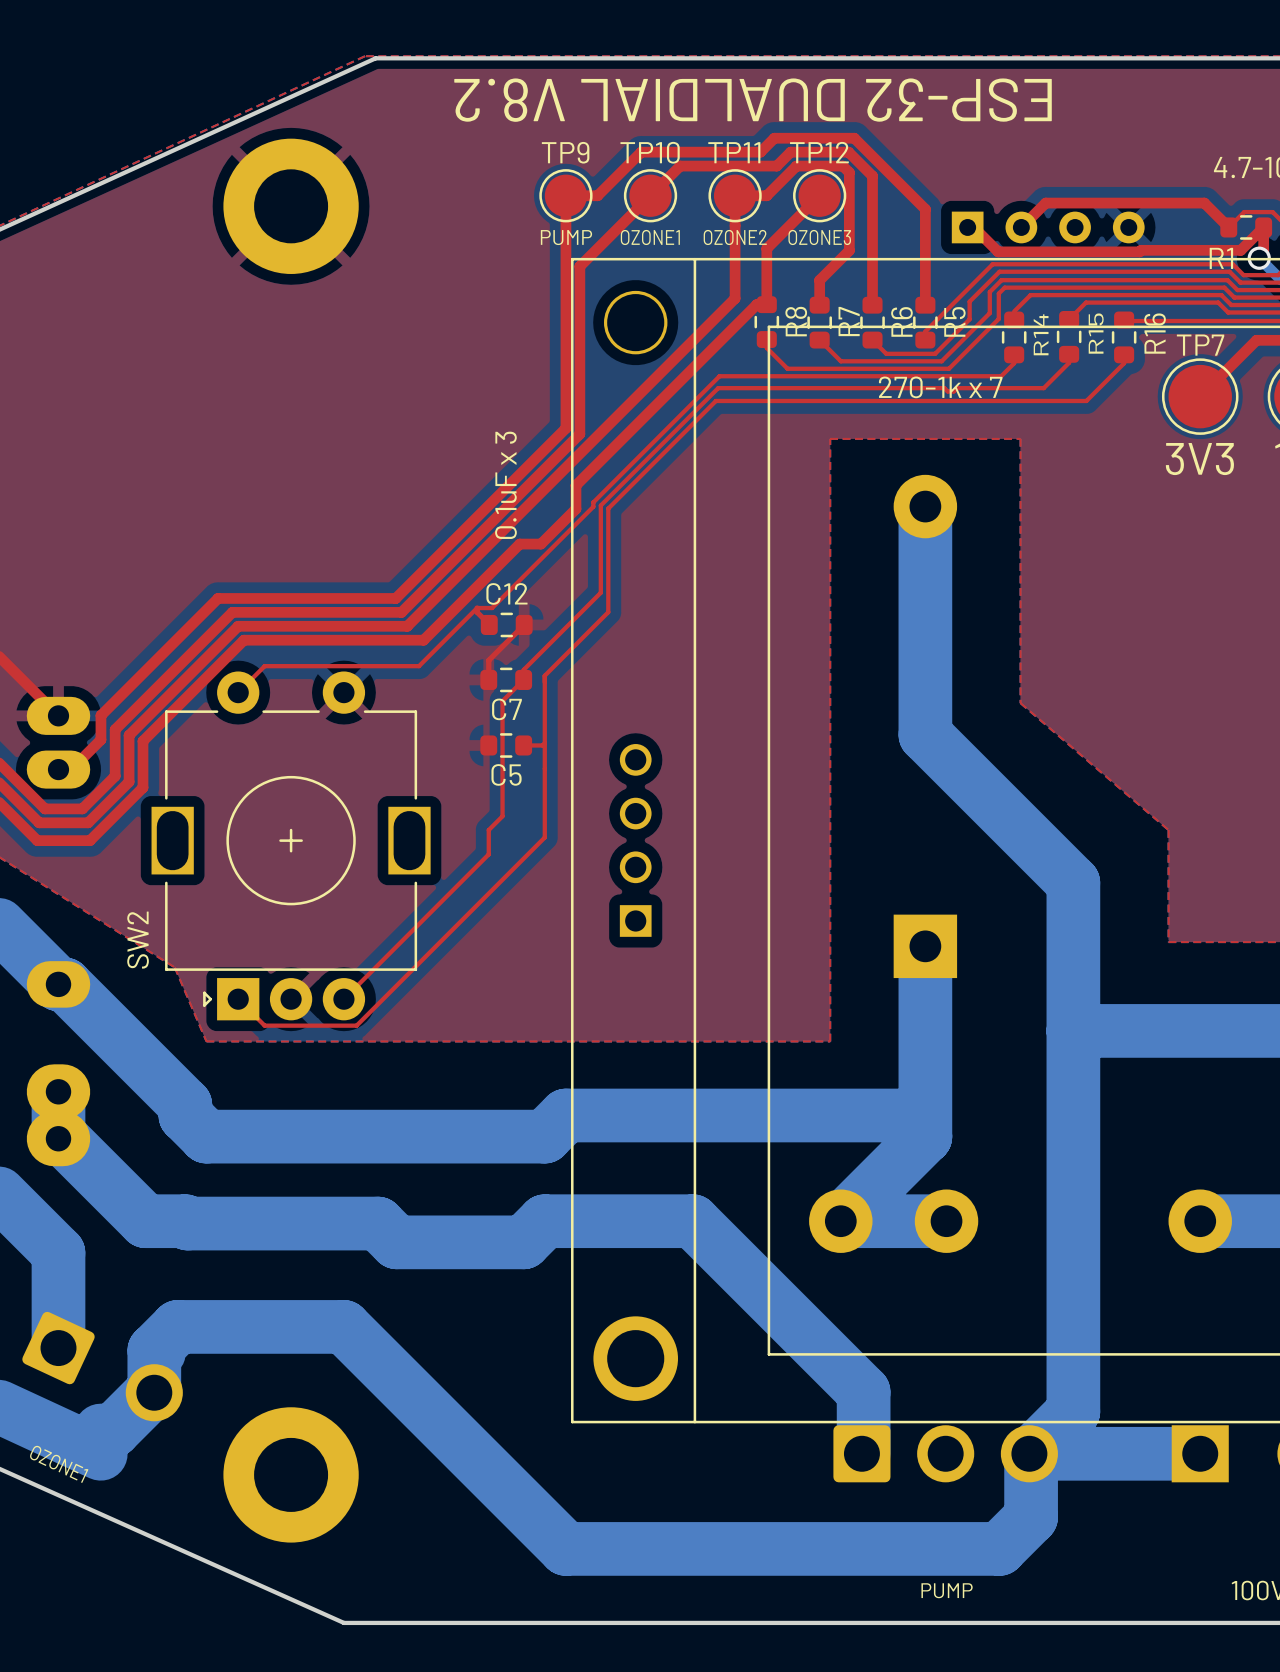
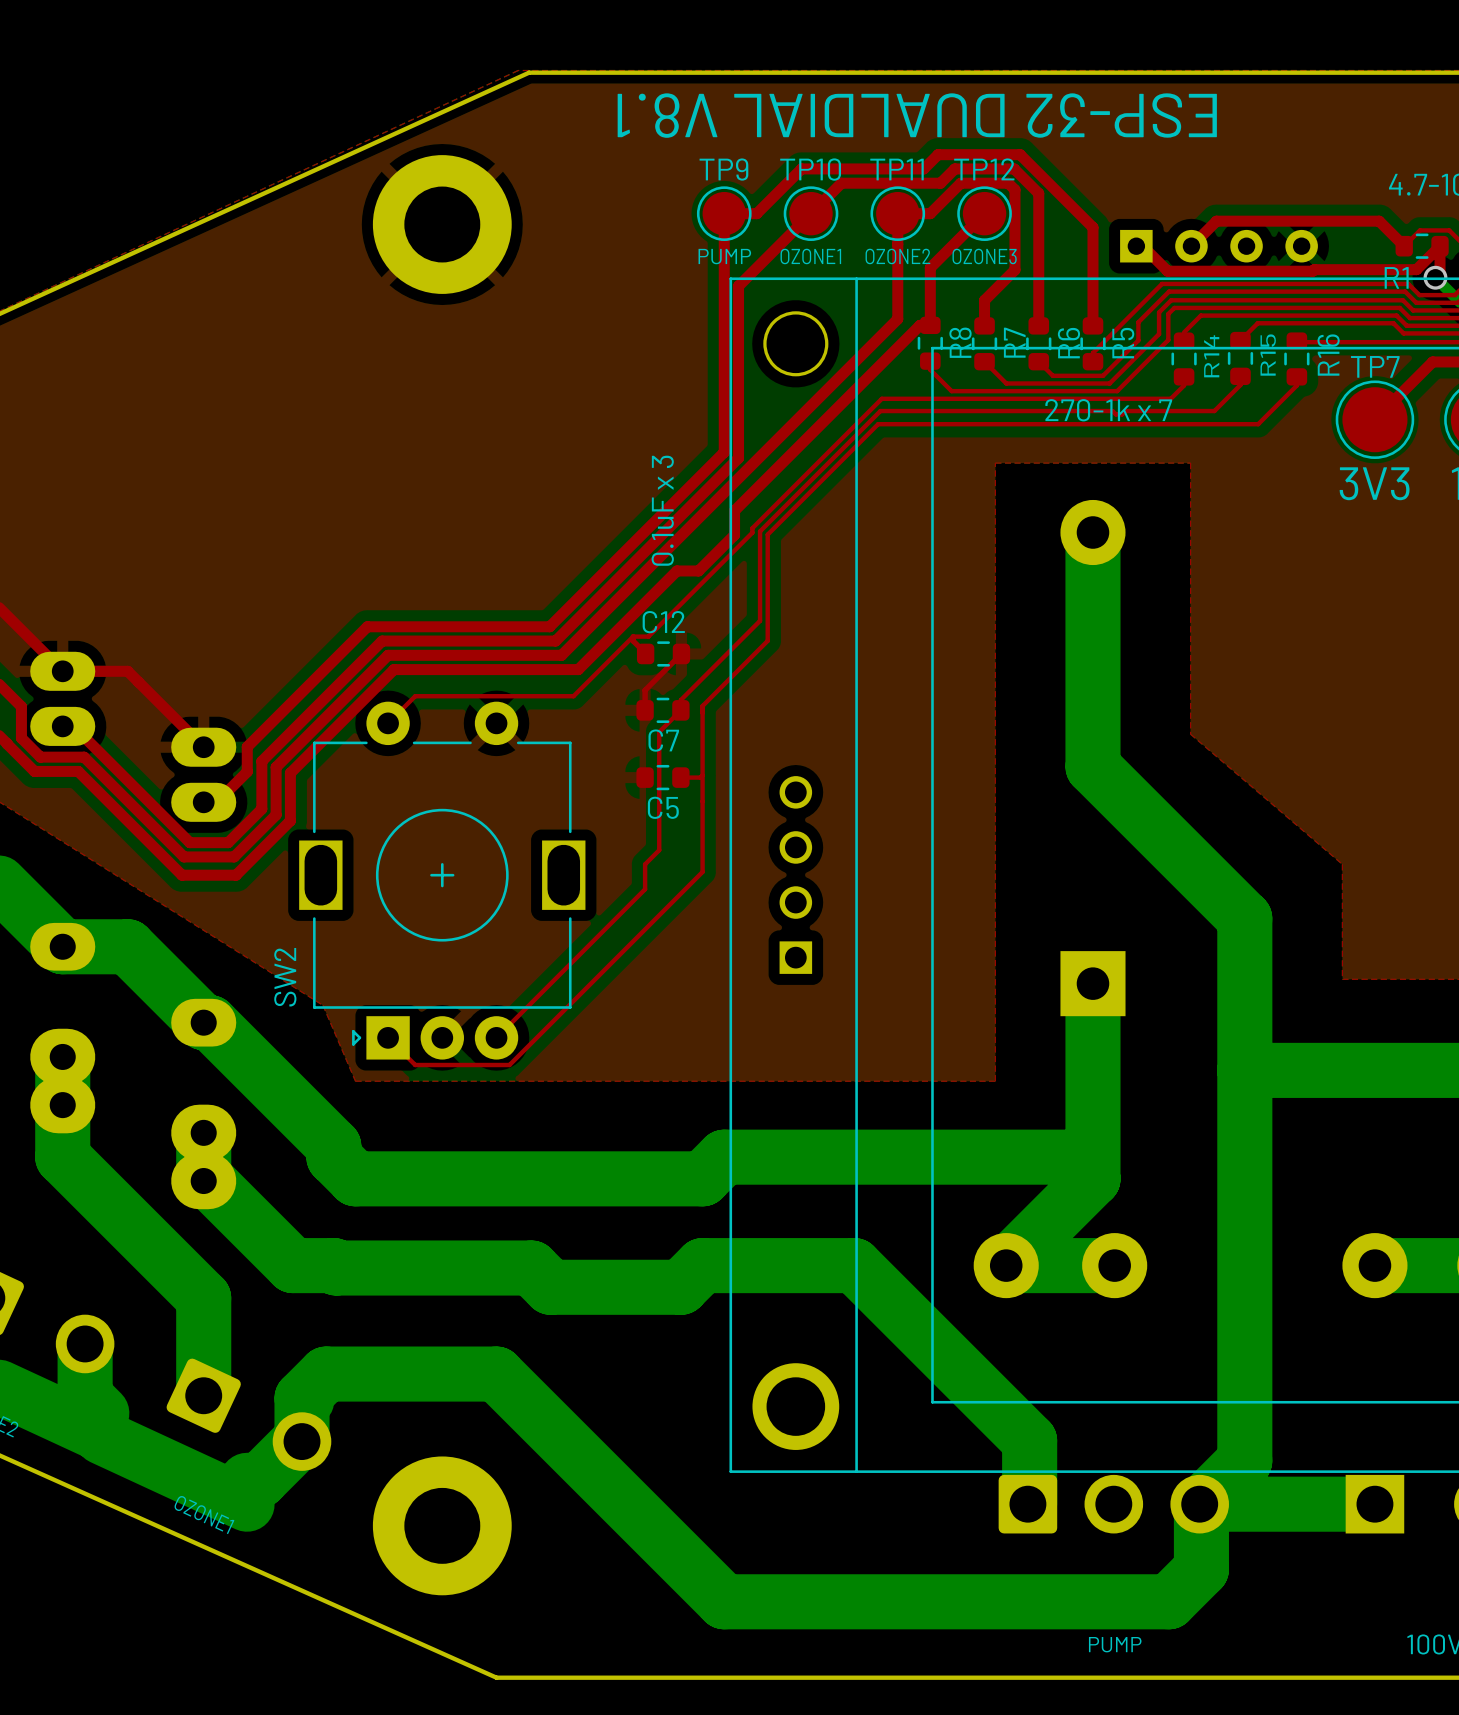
text: ESP-32 DUALDIAL V8.2 (753, 100) -> ESP-32 DUALDIAL V8.1 (917, 115)

